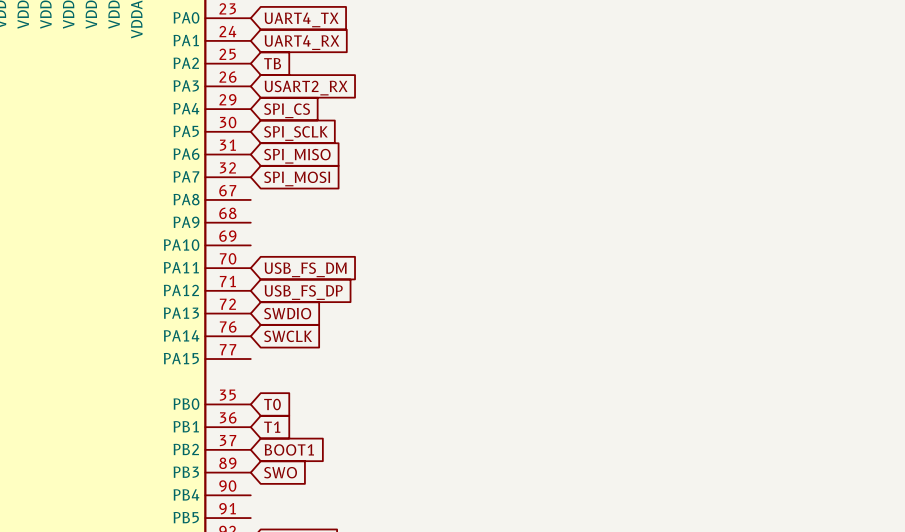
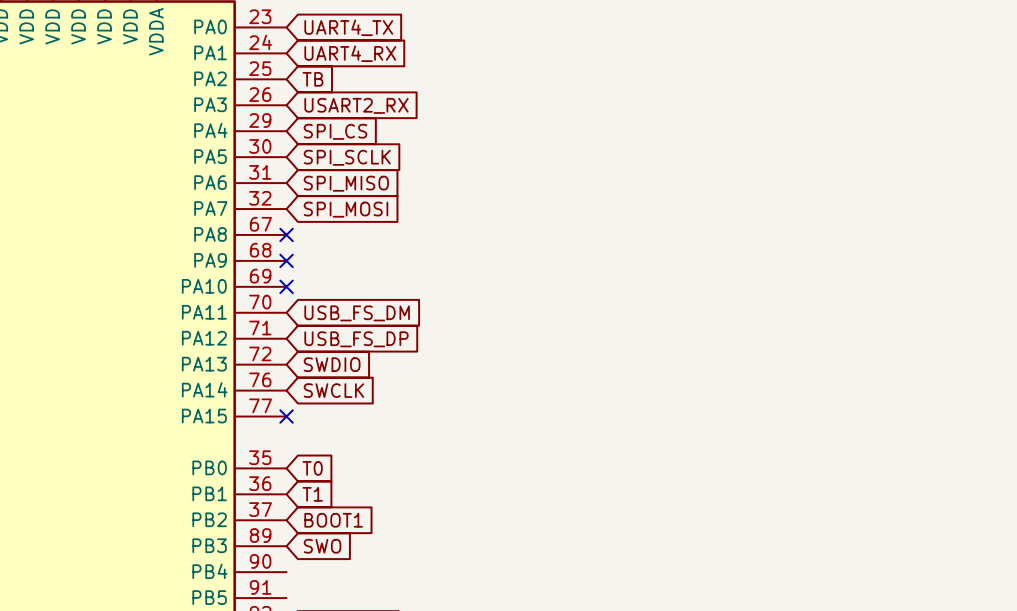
no-connect mark: none -> (286, 234)
no-connect mark: none -> (286, 260)
no-connect mark: none -> (286, 286)
no-connect mark: none -> (286, 416)

